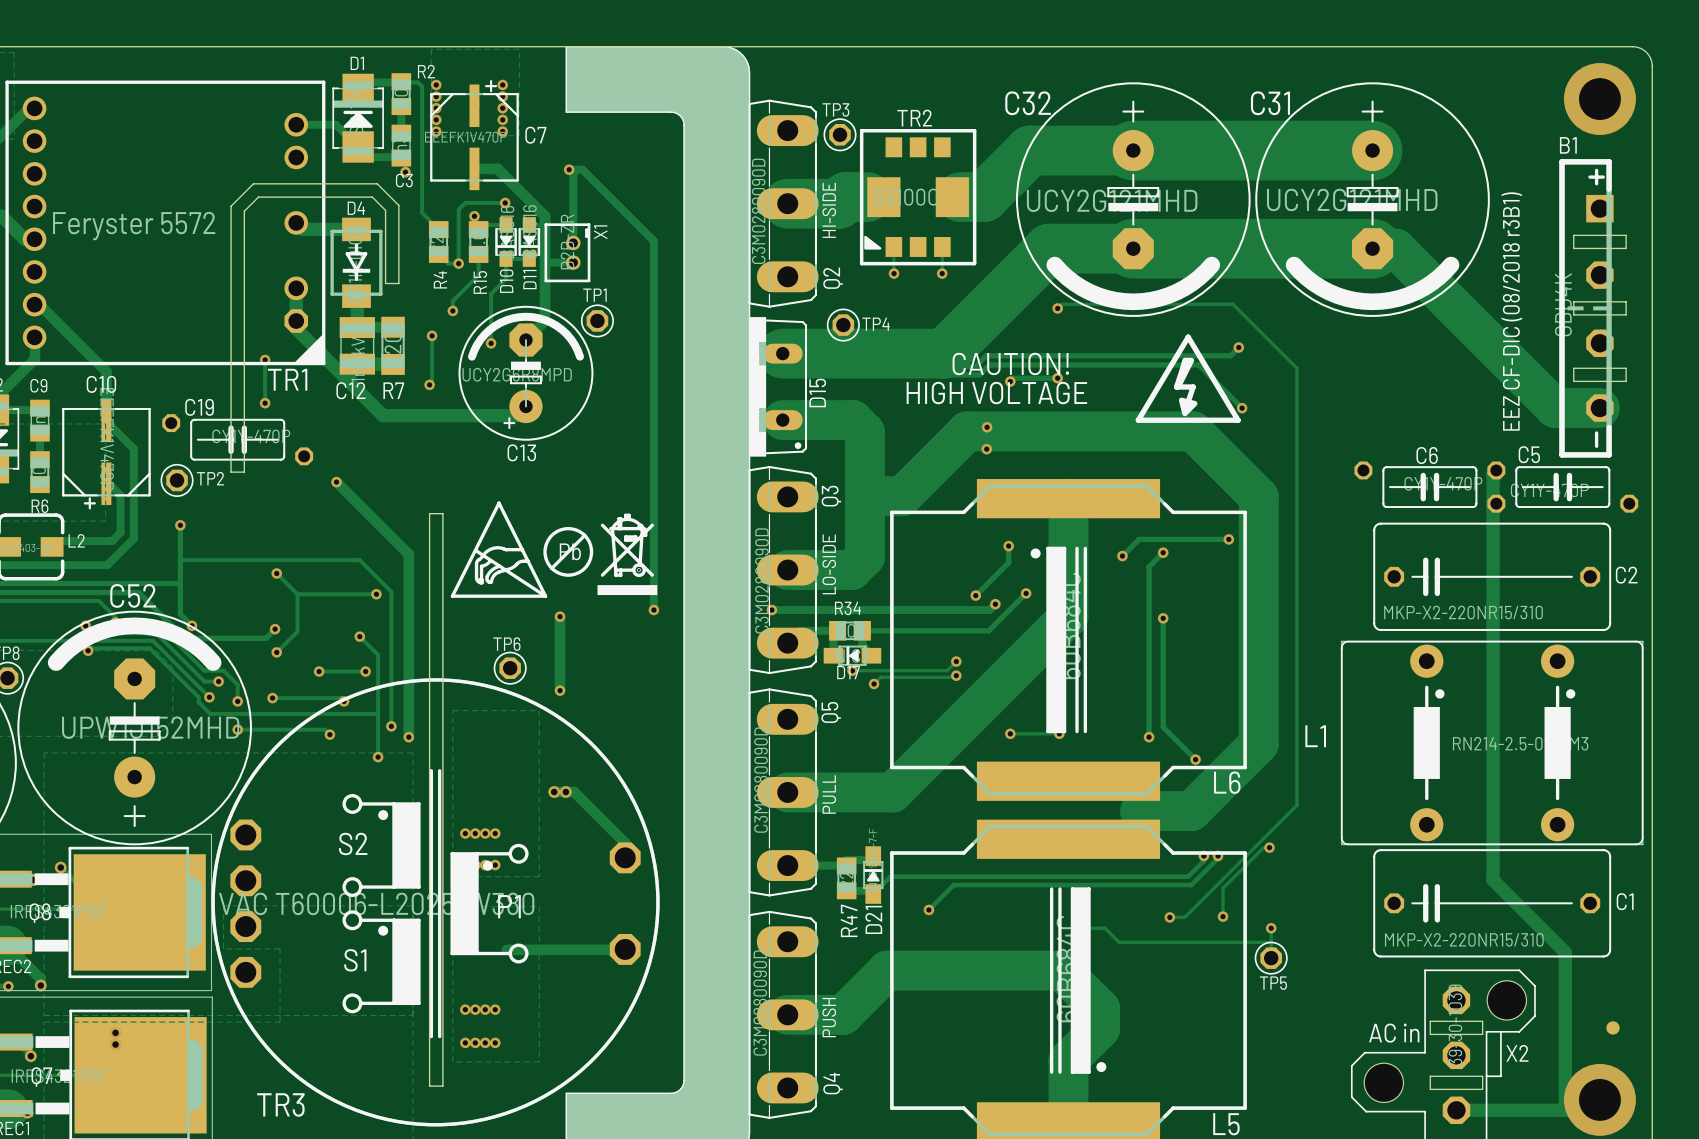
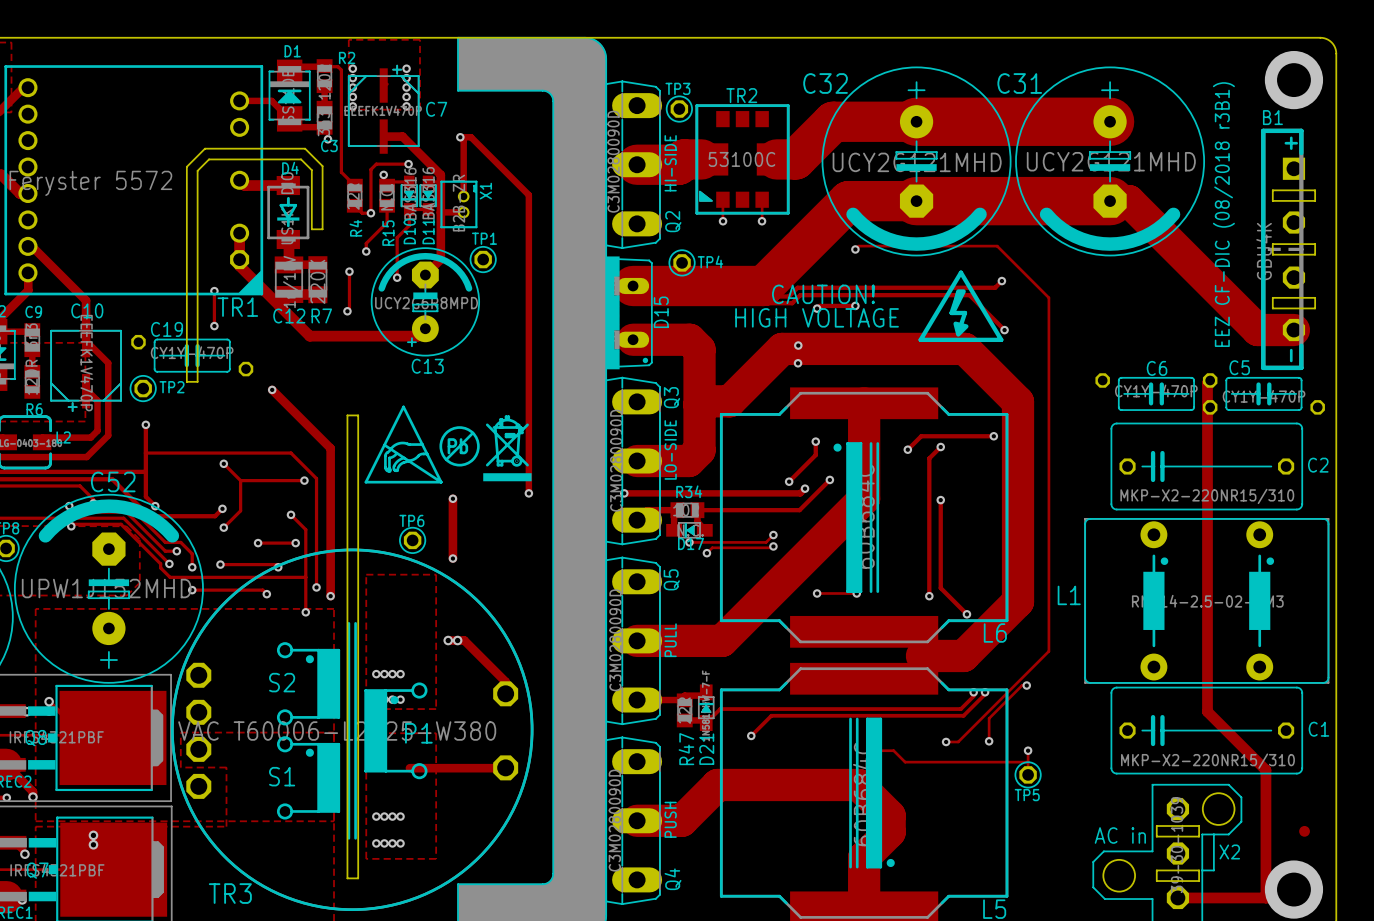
C13 footprint: [458, 305, 594, 441] -> [370, 247, 480, 357]

